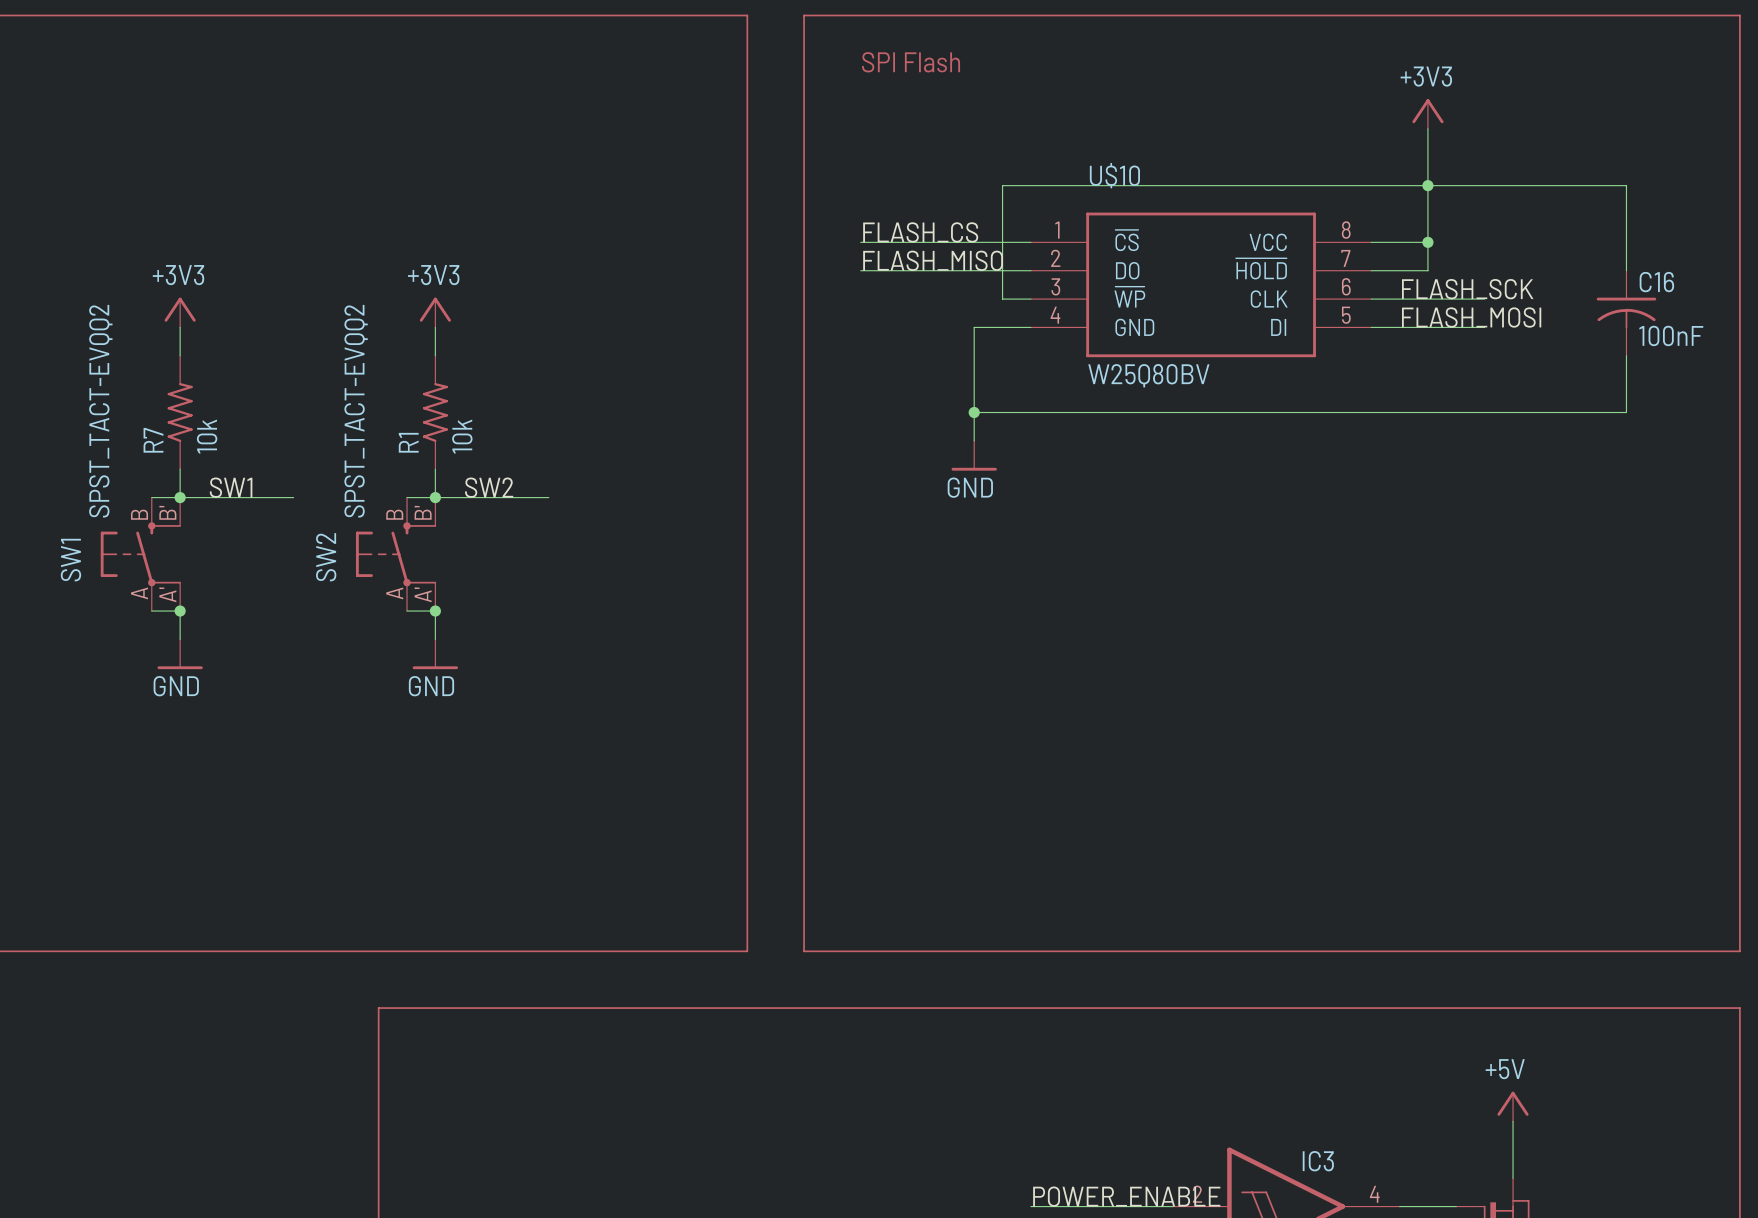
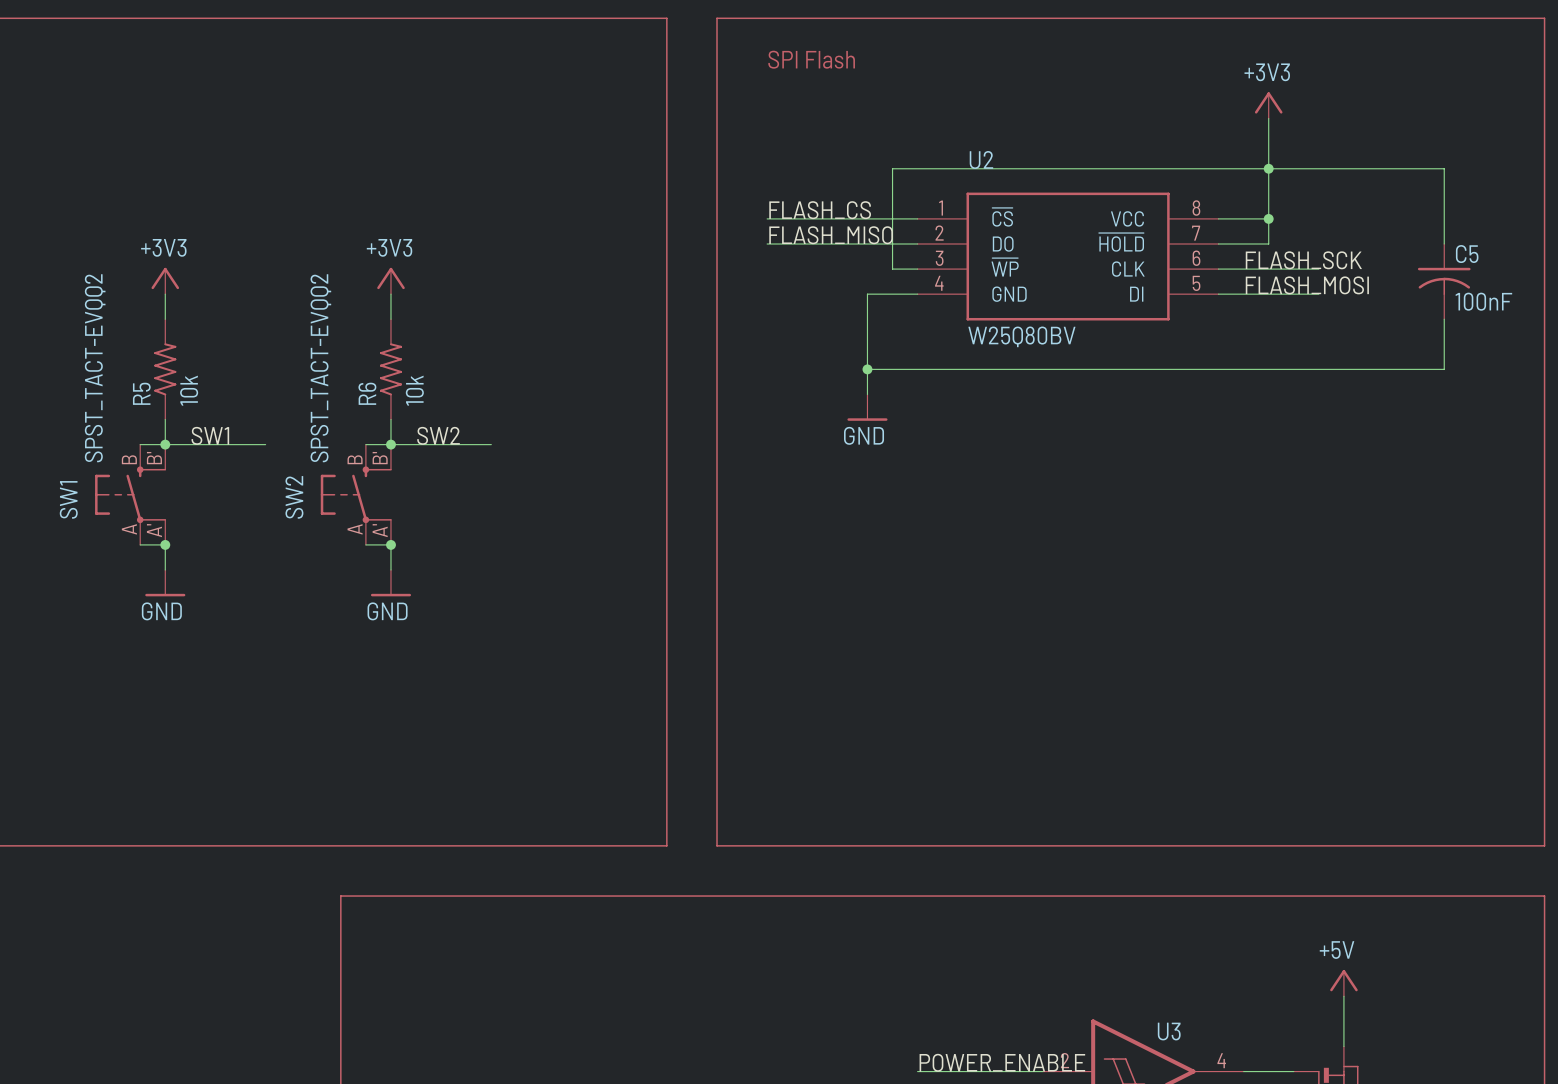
U$10 name: U$10 (1114, 175) -> U2 (981, 159)
C16 name: C16 (1656, 282) -> C5 (1467, 254)
R7 name: R7 (153, 440) -> R5 (141, 393)
R1 name: R1 (408, 442) -> R6 (367, 393)
IC3 name: IC3 (1318, 1161) -> U3 (1169, 1031)

